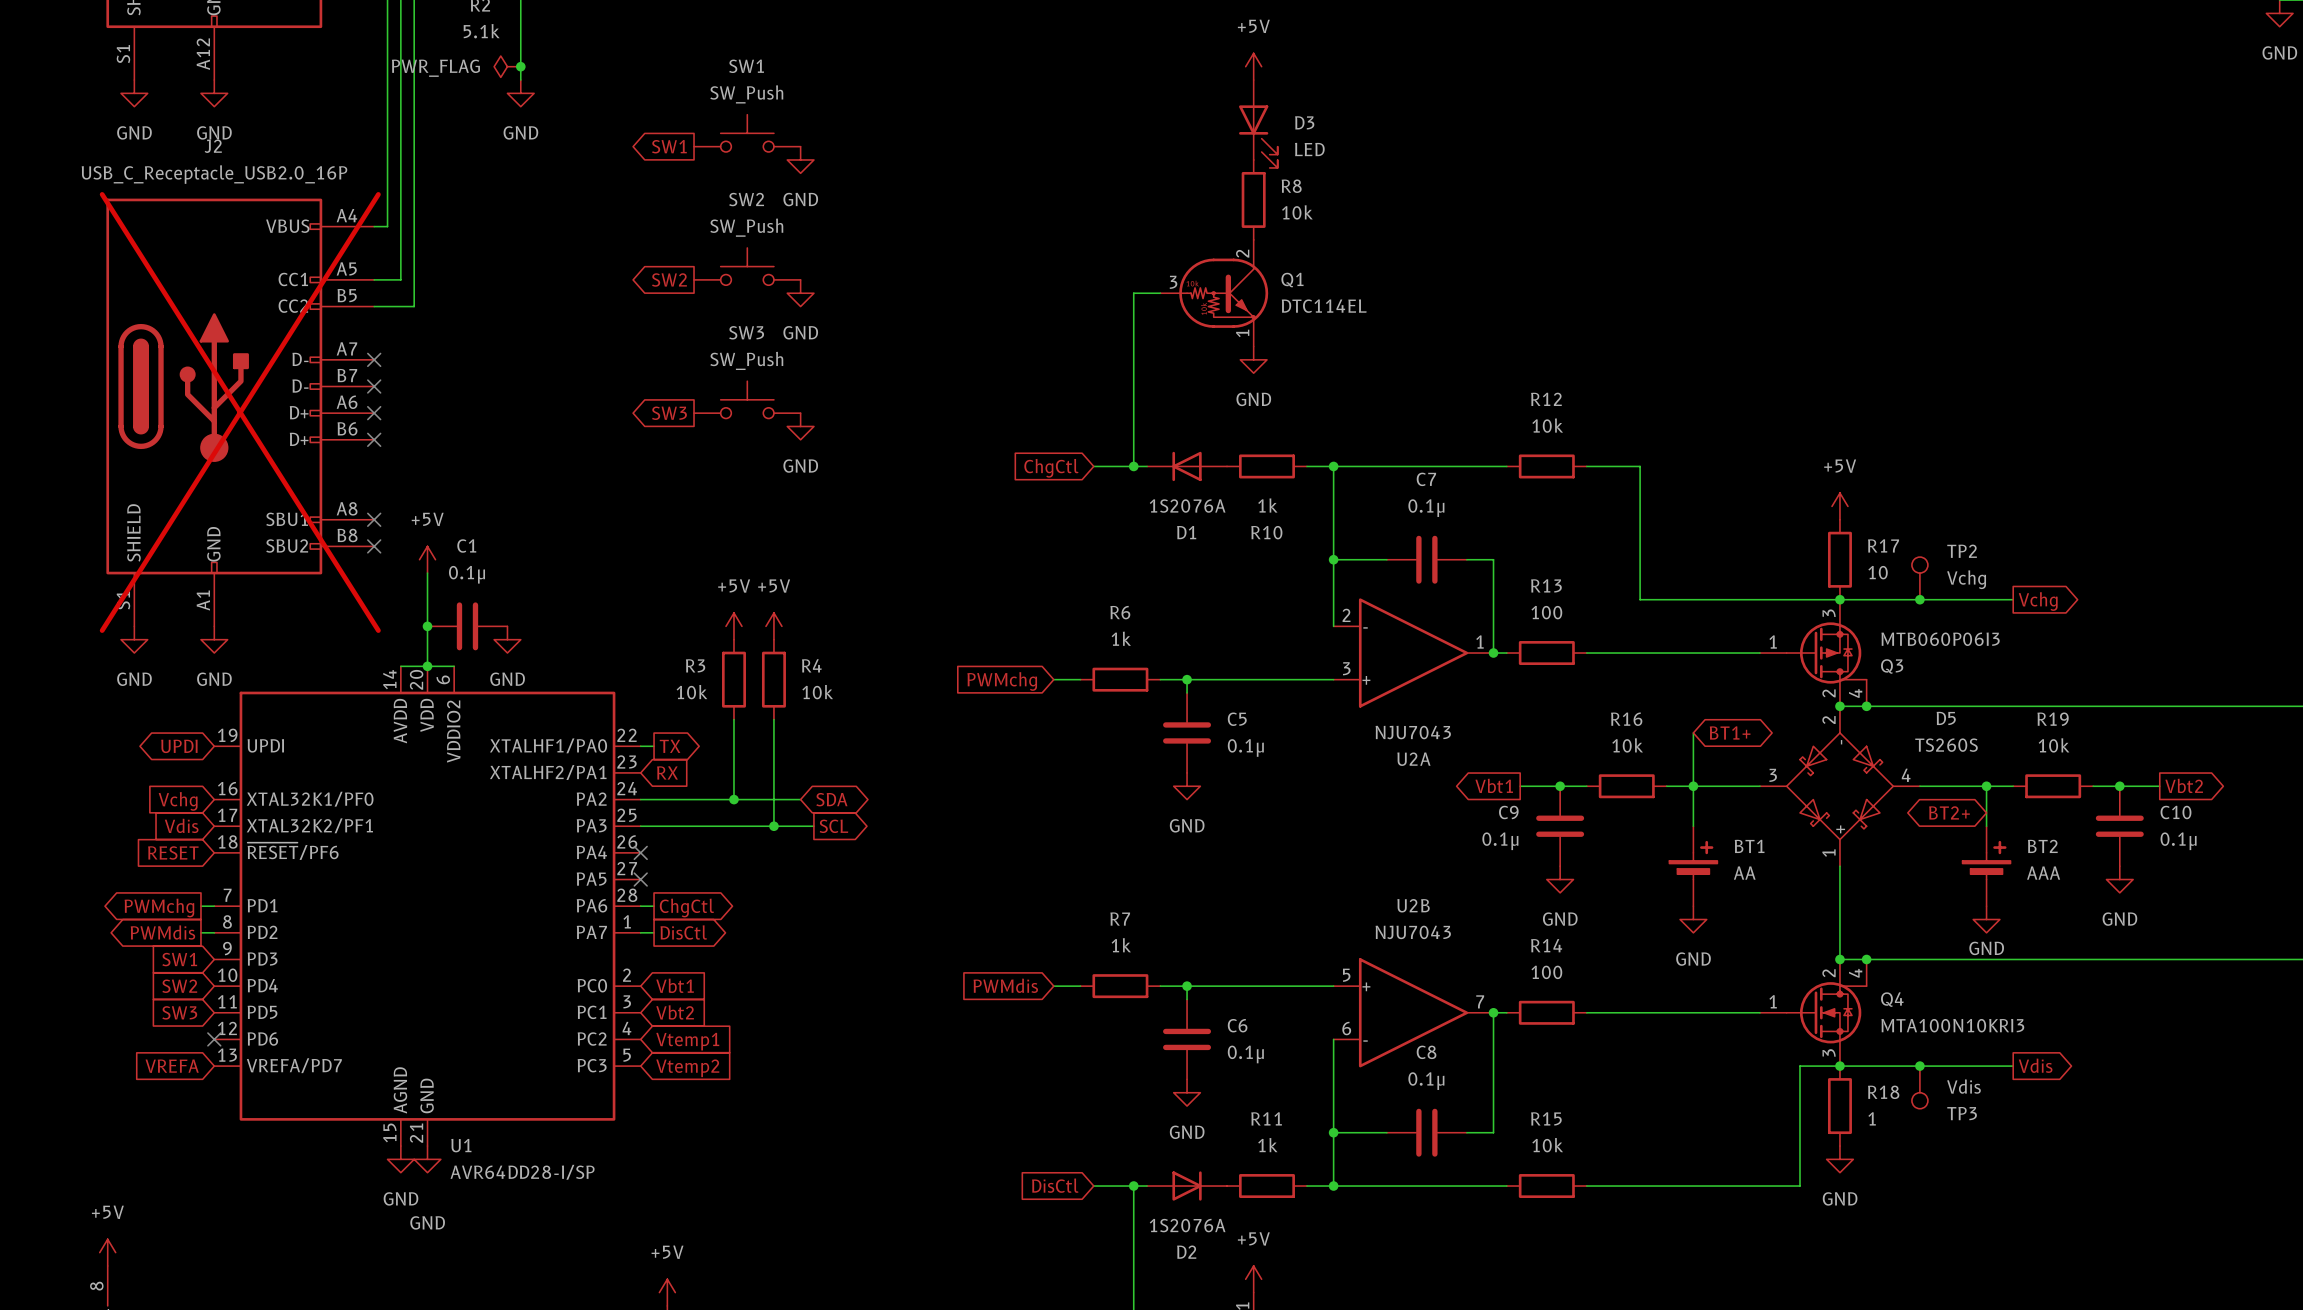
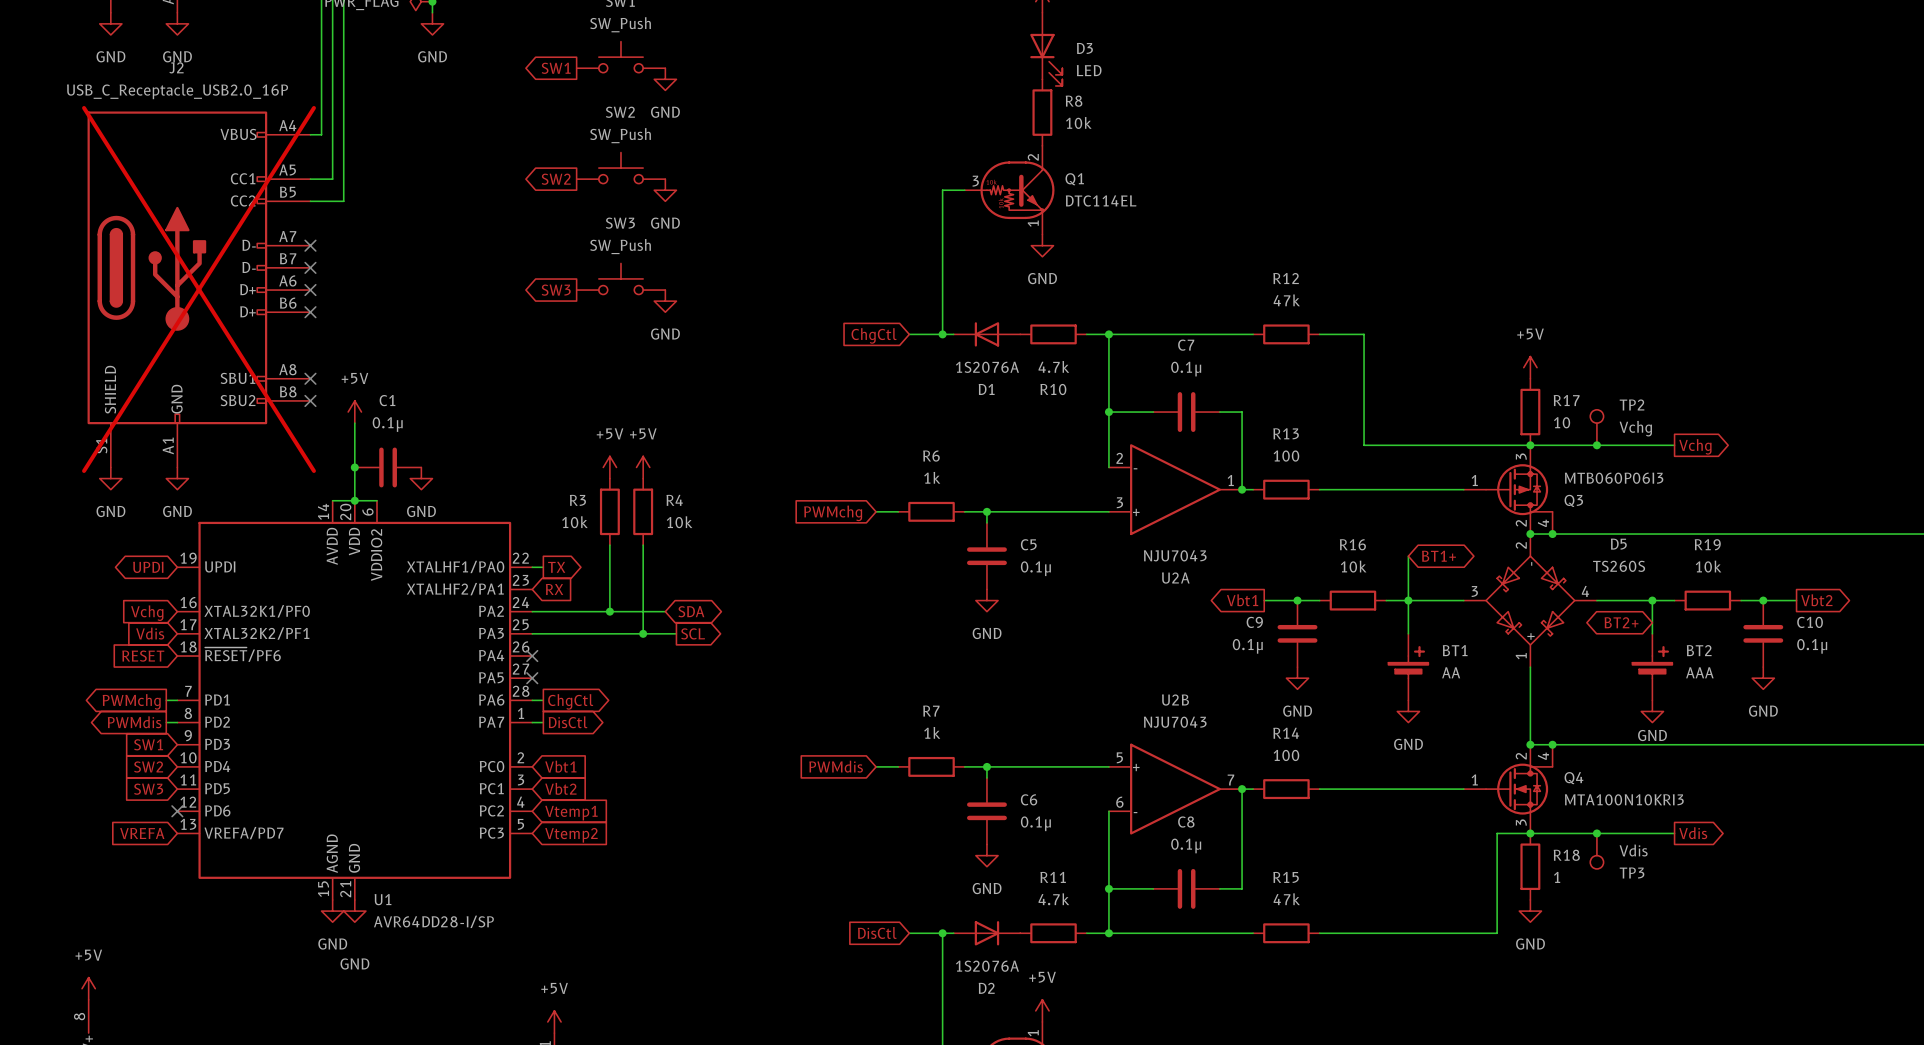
R12 value: 10k (1547, 425) -> 47k (1286, 300)
R10 value: 1k (1267, 505) -> 4.7k (1053, 366)
R11 value: 1k (1267, 1145) -> 4.7k (1053, 899)
R15 value: 10k (1547, 1145) -> 47k (1286, 899)

